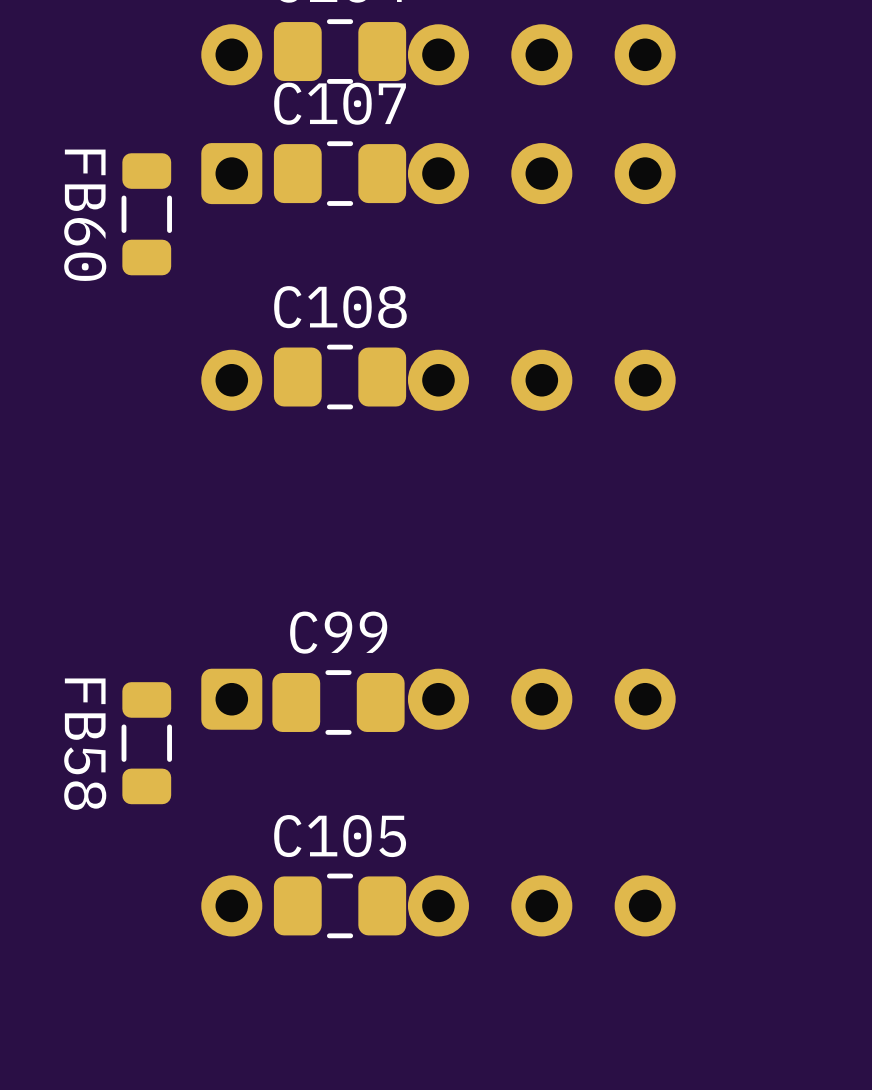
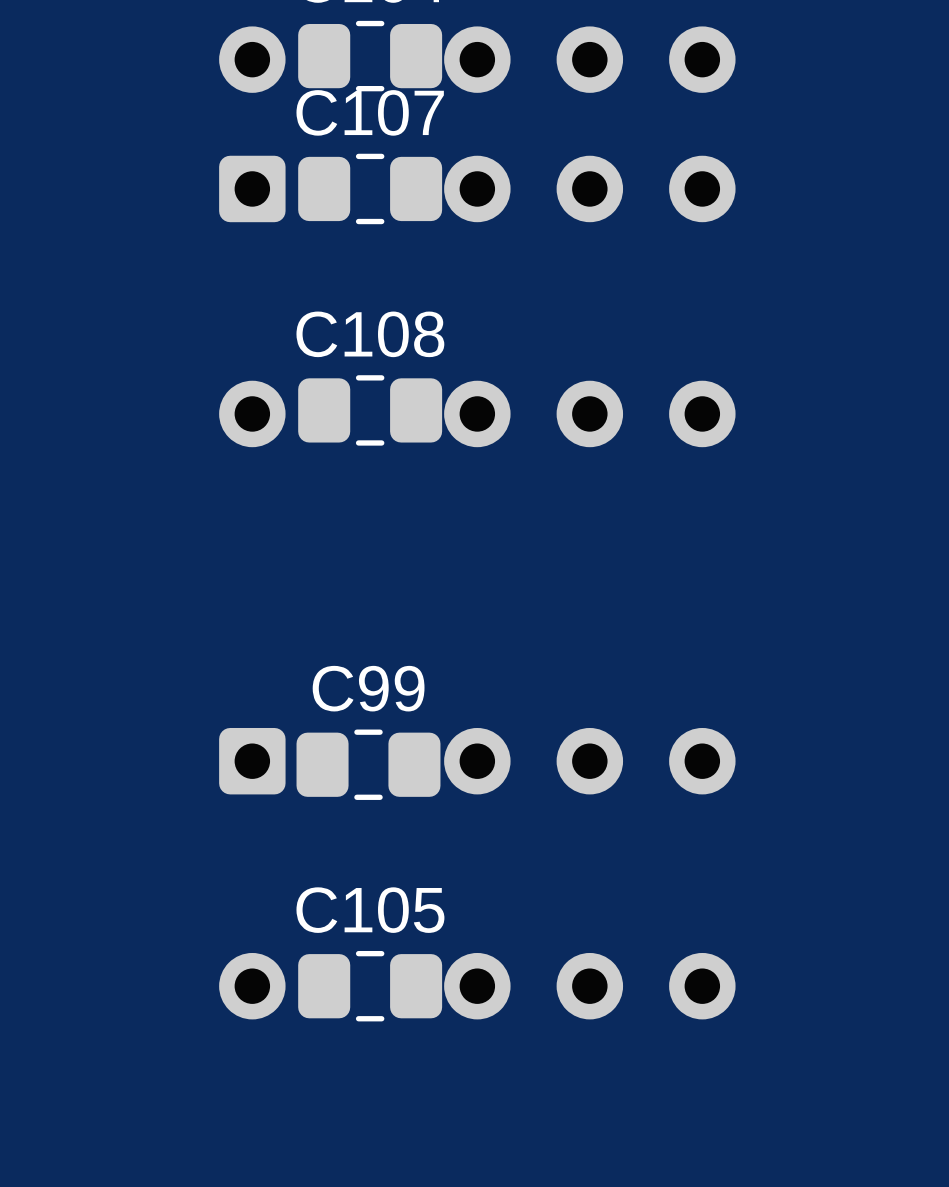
FB60: (146, 214) -> none
FB58: (146, 743) -> none

